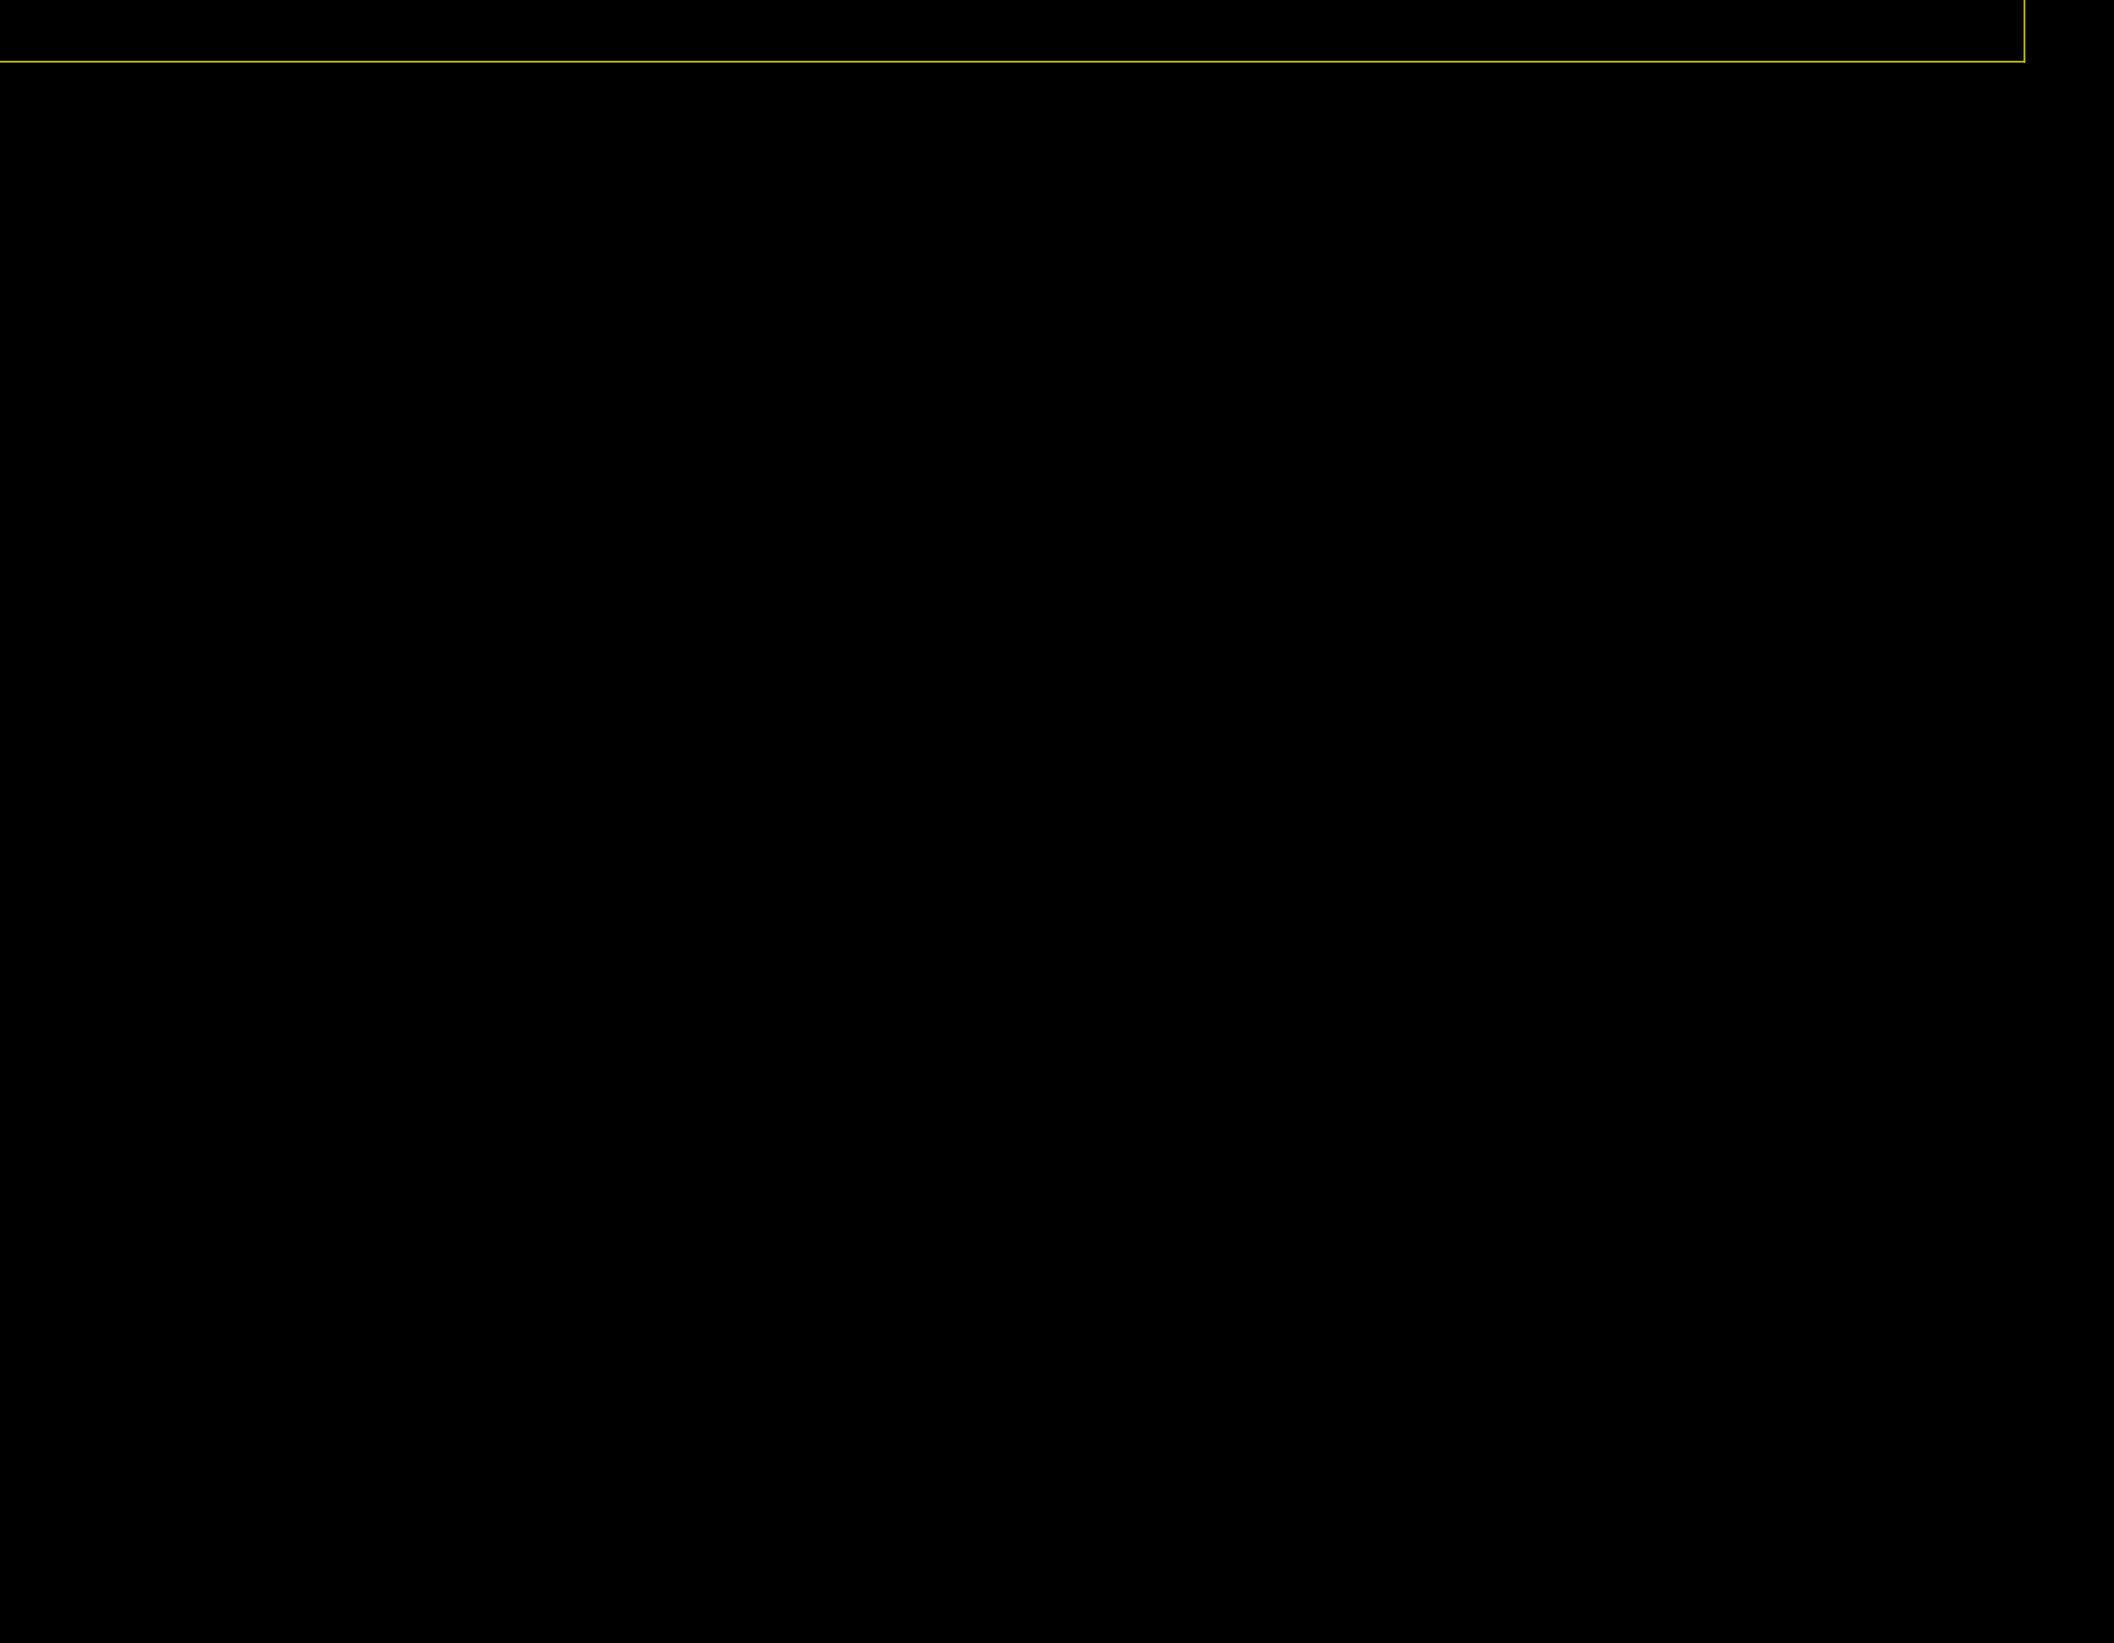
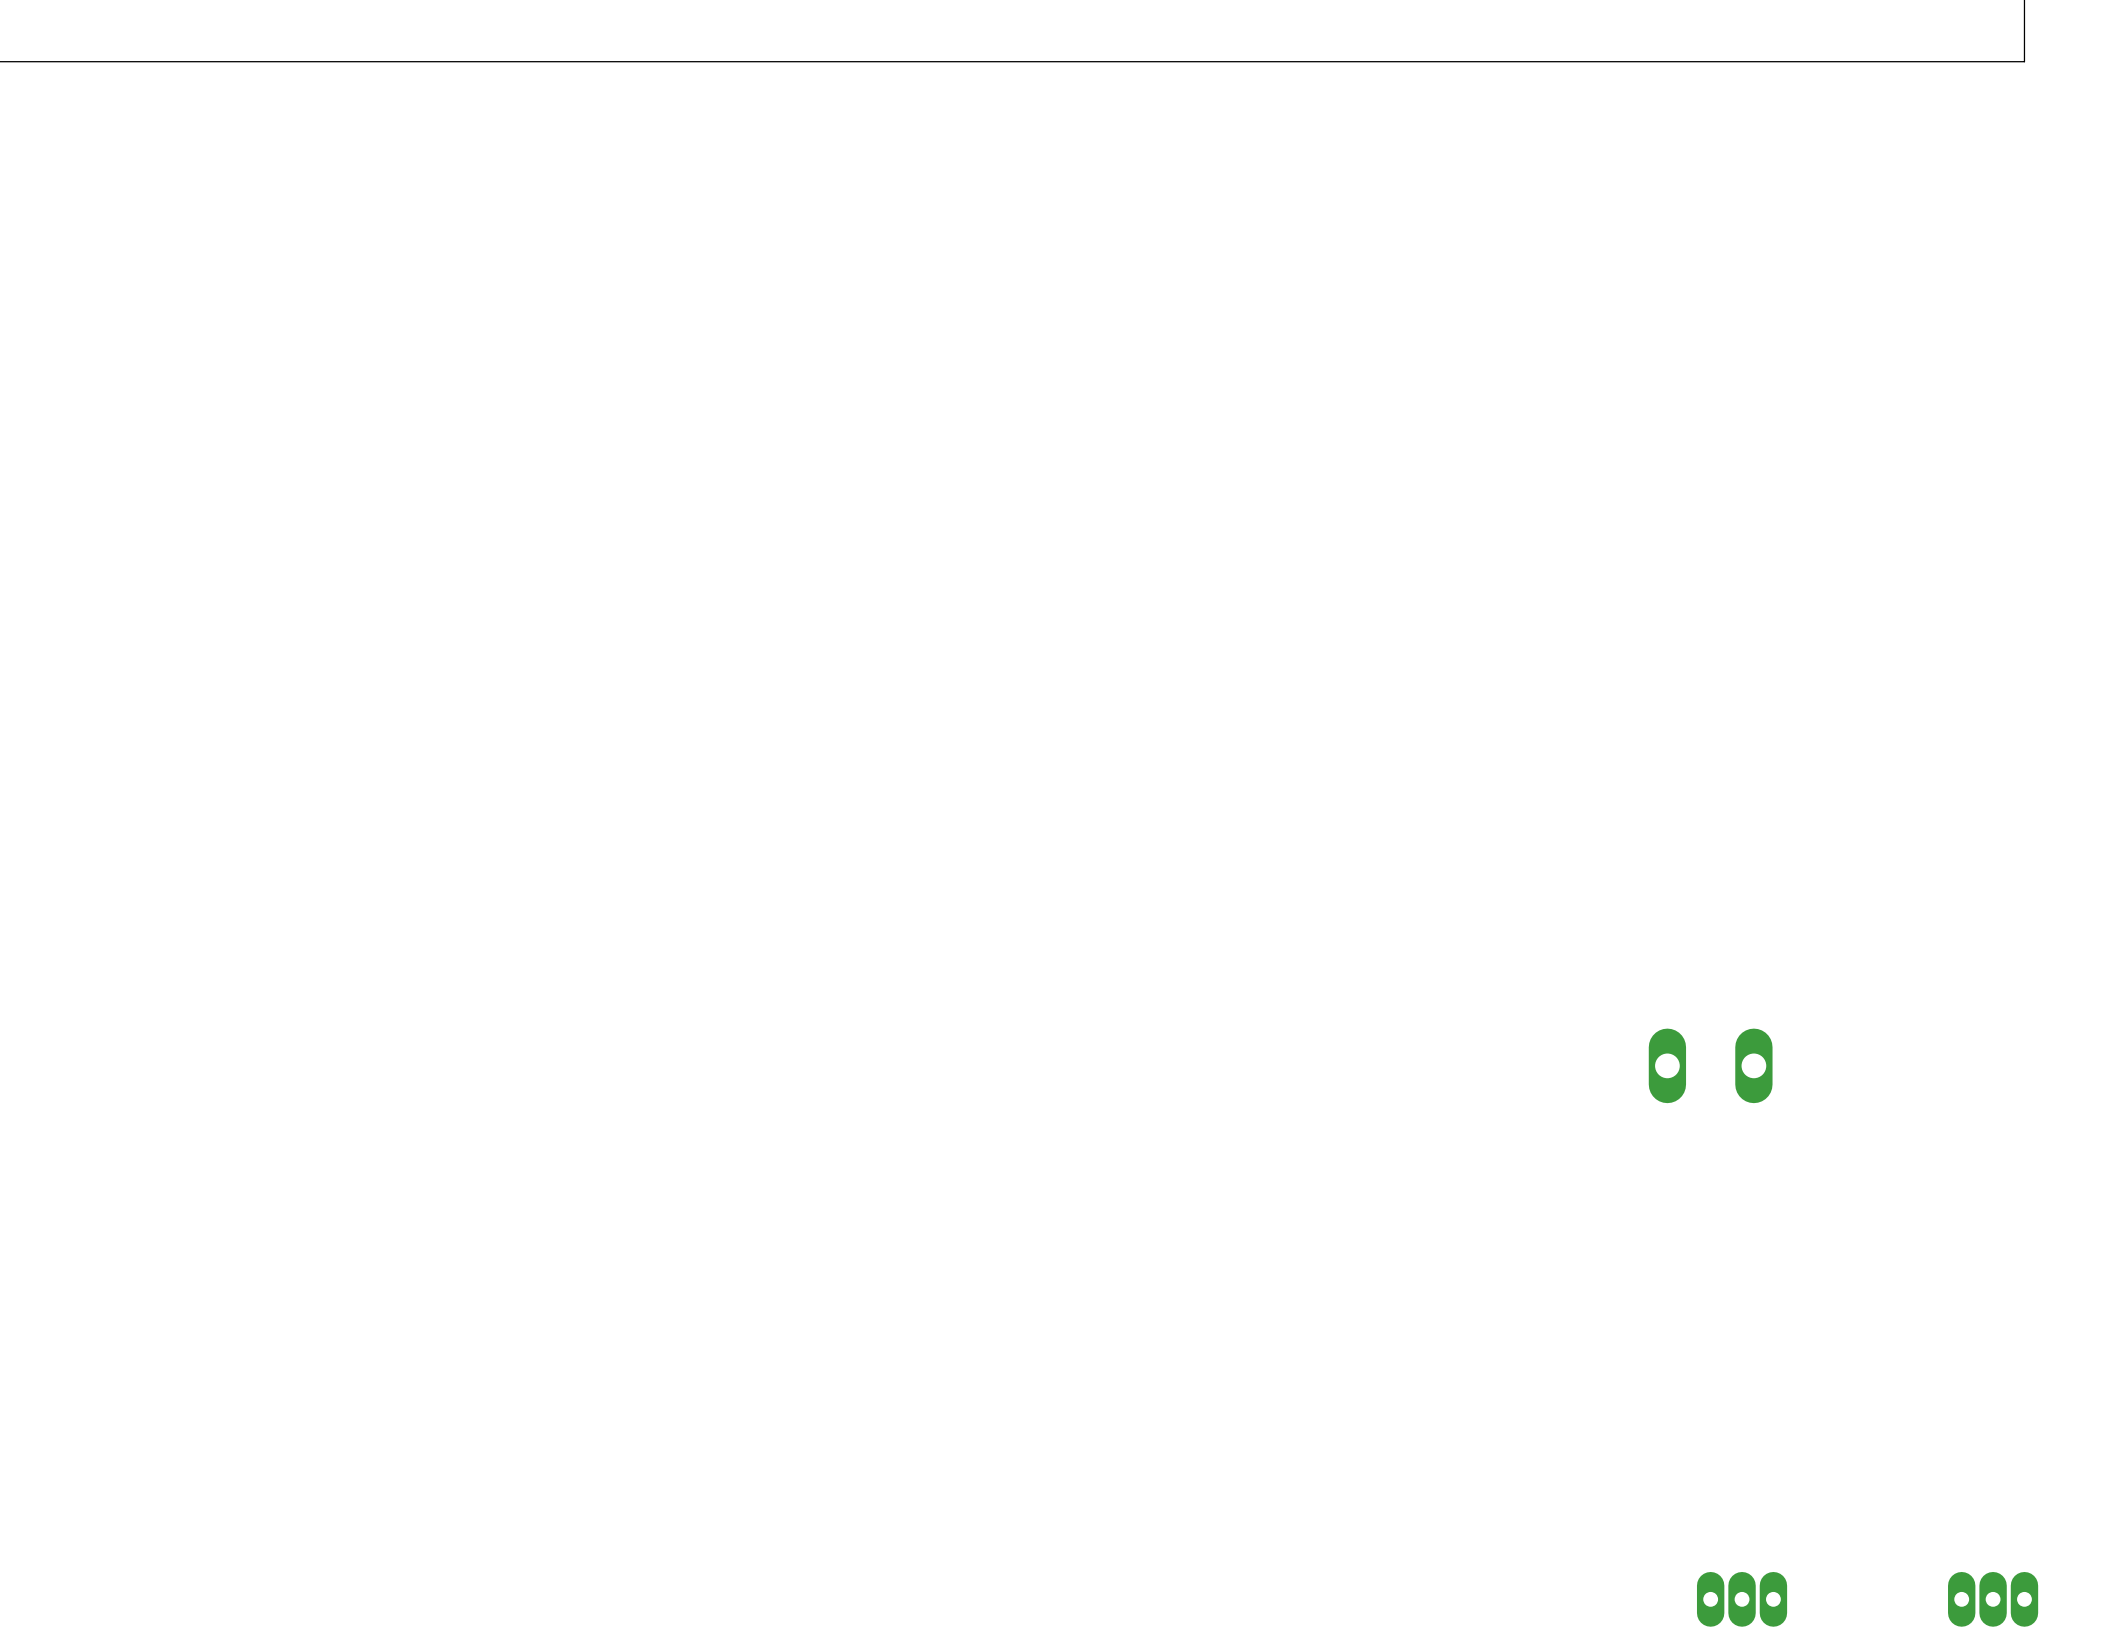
part: none -> (1710, 1065)
part: none -> (1742, 1599)
part: none -> (1993, 1599)

